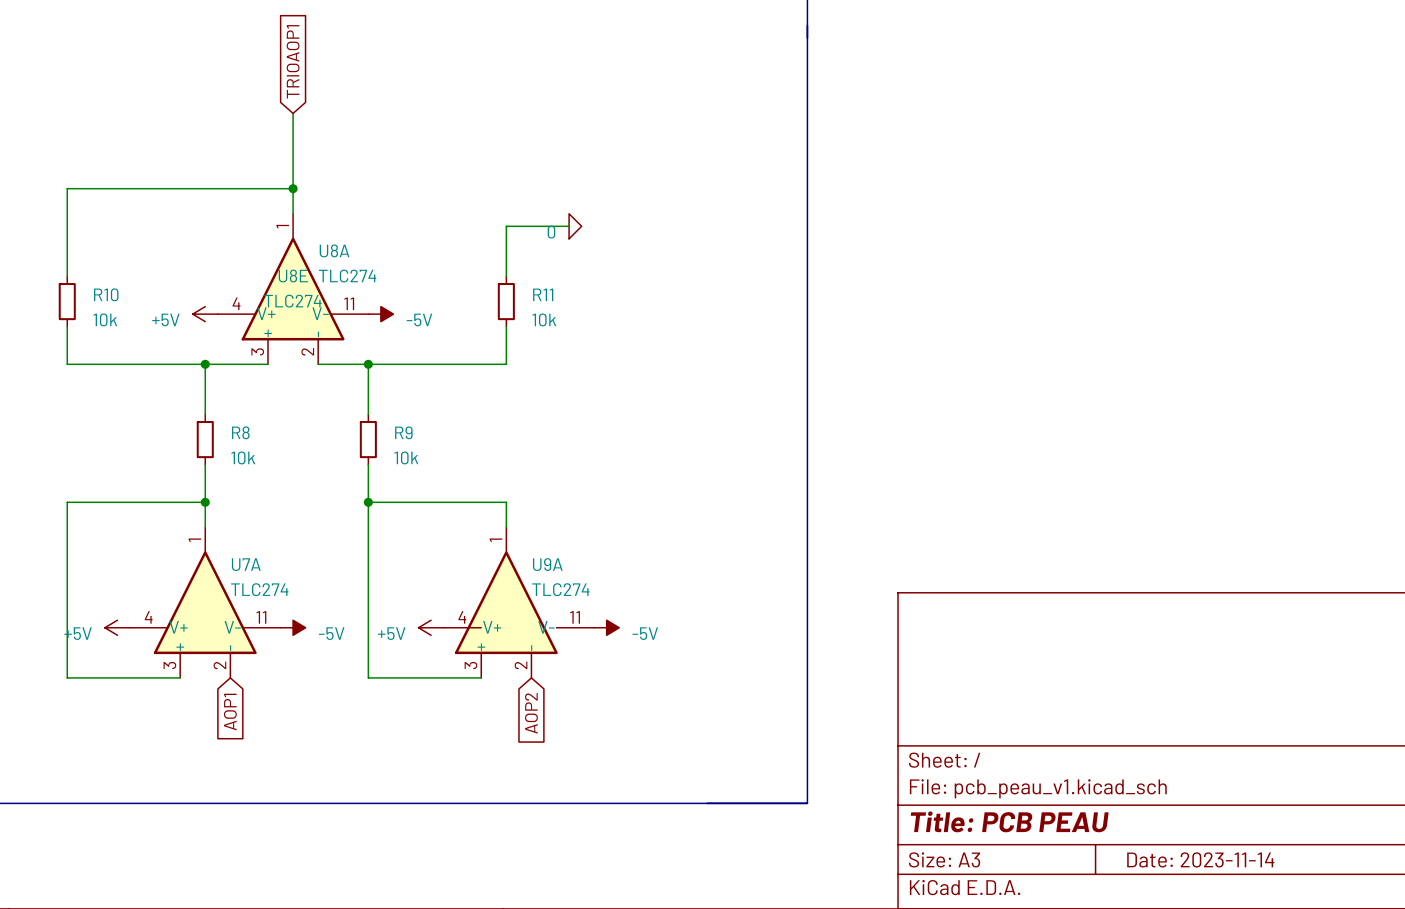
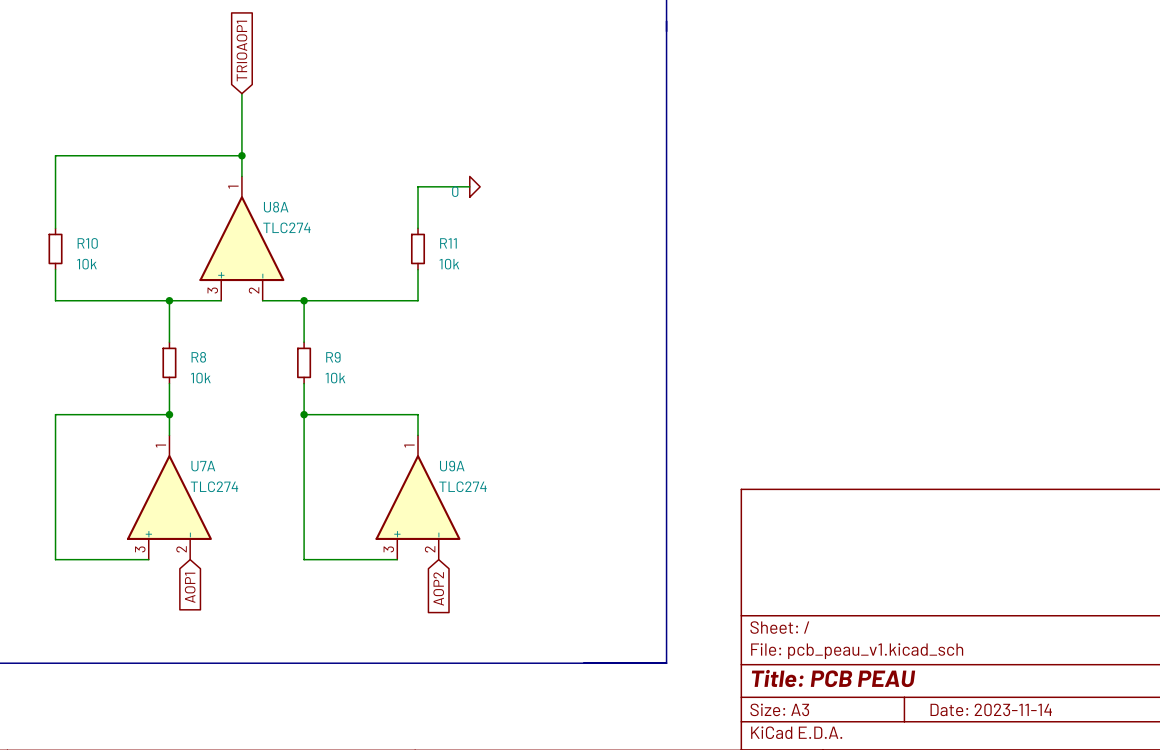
power symbol: +5V (205, 314) -> none
U8E: TLC274 (293, 314) -> none
power symbol: -5V (380, 314) -> none
power symbol: +5V (117, 627) -> none
part: (205, 627) -> none
power symbol: -5V (293, 627) -> none
power symbol: +5V (431, 627) -> none
part: (518, 627) -> none
power symbol: -5V (606, 627) -> none

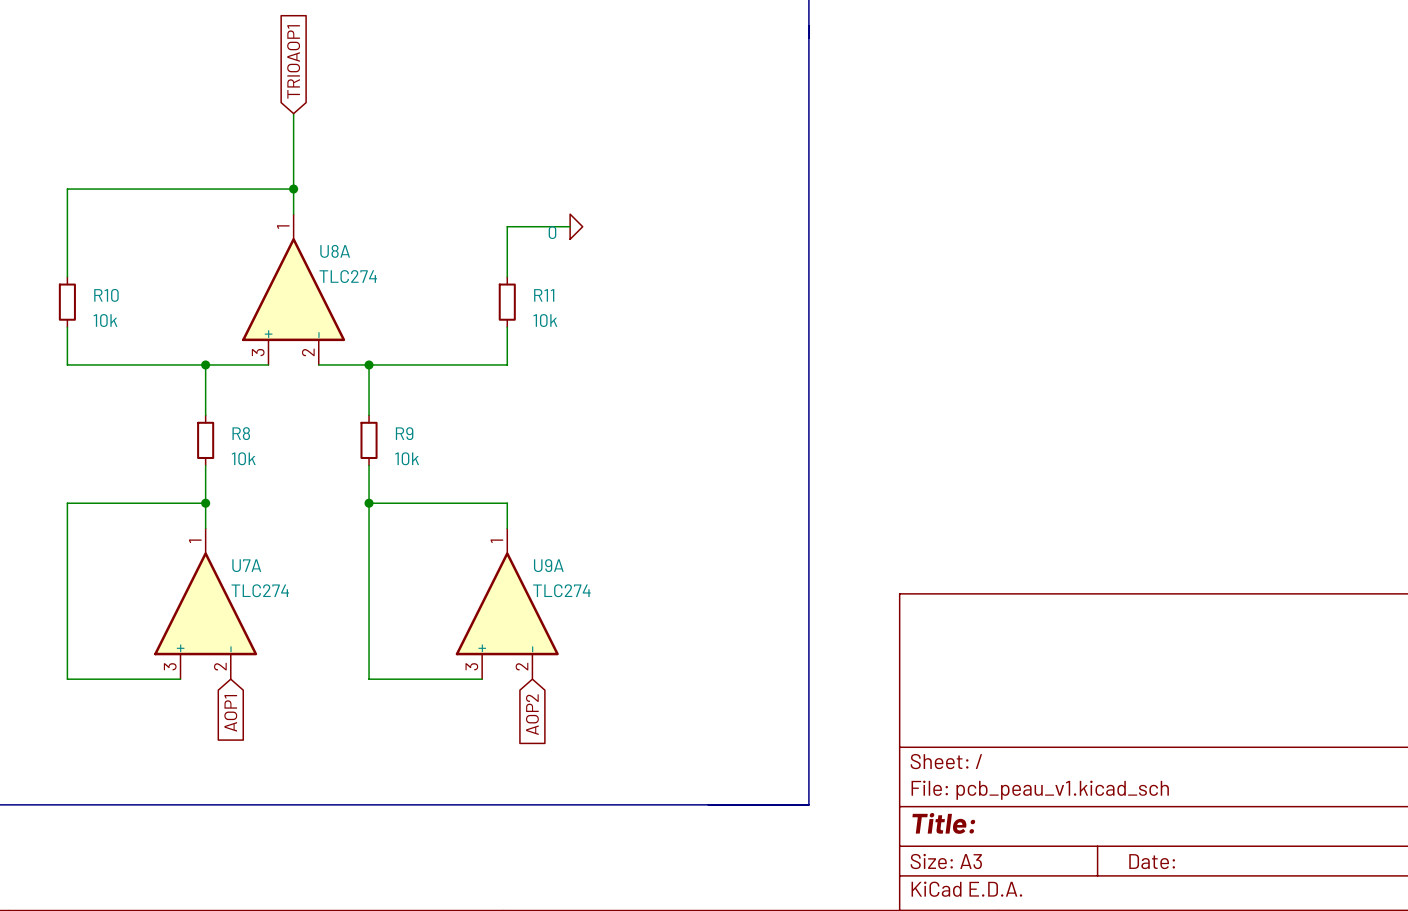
title block: Title: PCB PEAU (833, 678) -> Title: (943, 823)
title block: Date: 2023-11-14 (991, 709) -> Date: (1152, 861)

